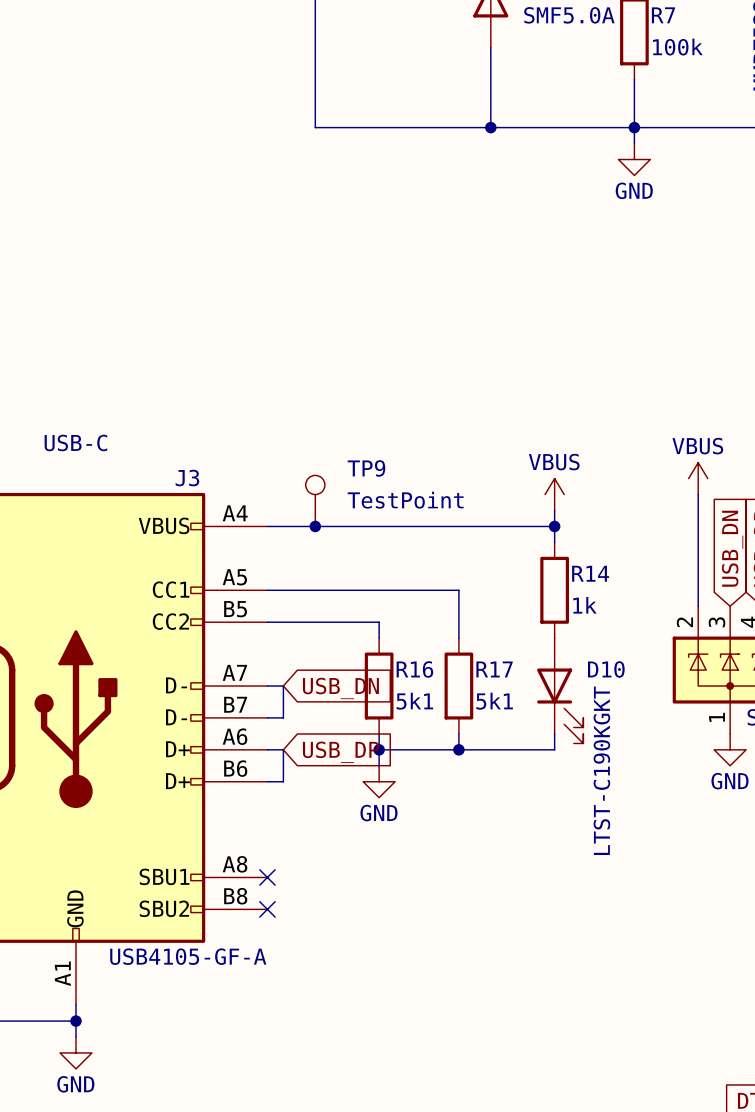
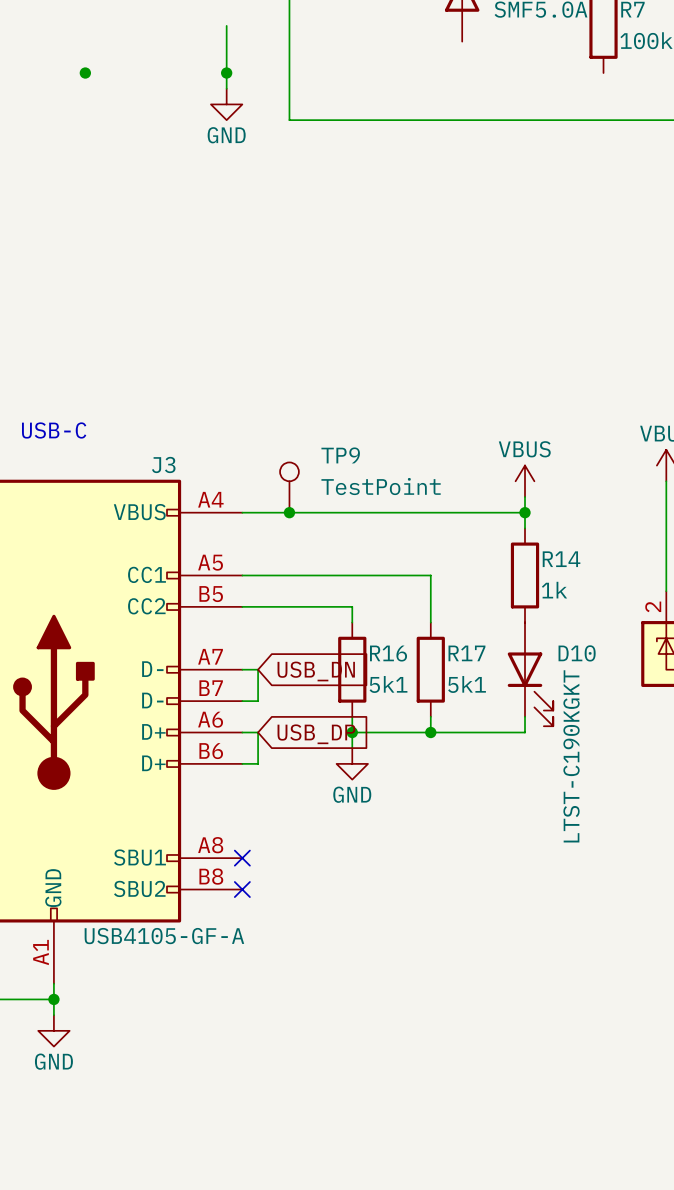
wire: none -> (226, 25) (226, 88)
wire: (490, 47) (490, 127) -> none
junction: none -> (85, 73)
junction: none -> (226, 73)
wire: (634, 79) (634, 143) -> none
power symbol: none -> GND (226, 104)
junction: (490, 127) -> none
junction: (634, 127) -> none
power symbol: GND (634, 159) -> none

